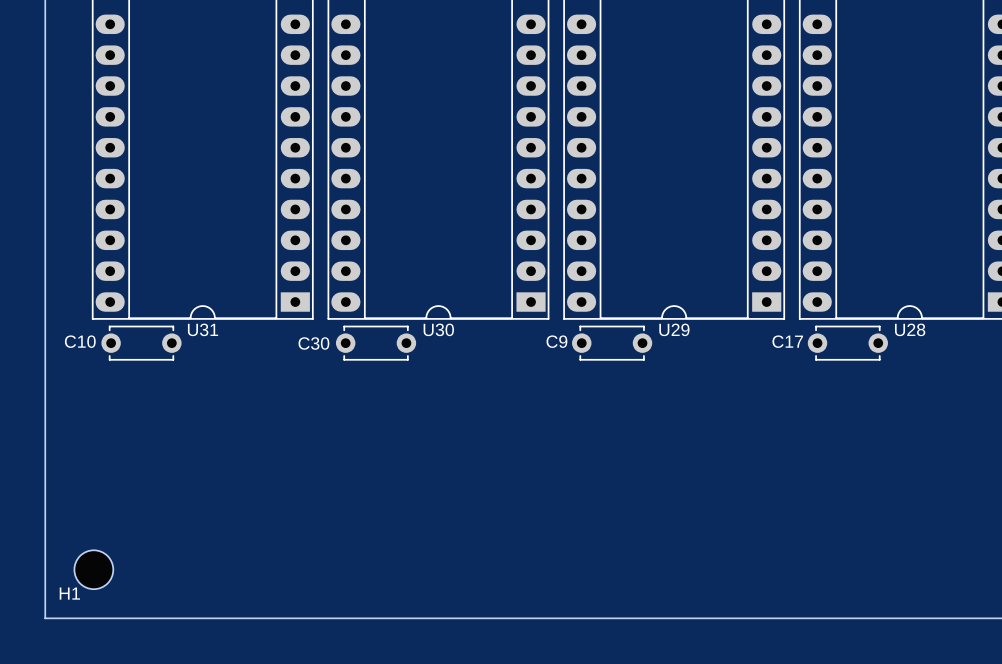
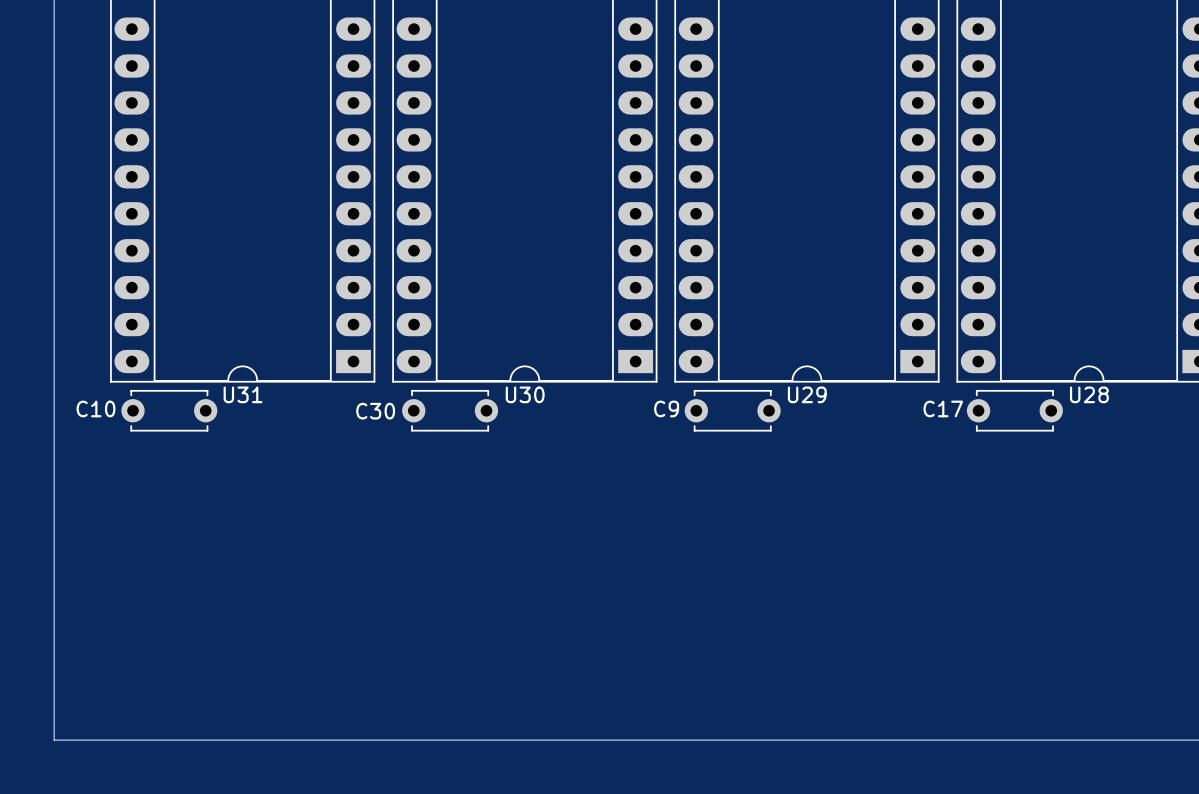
H1: (93, 569) -> none

